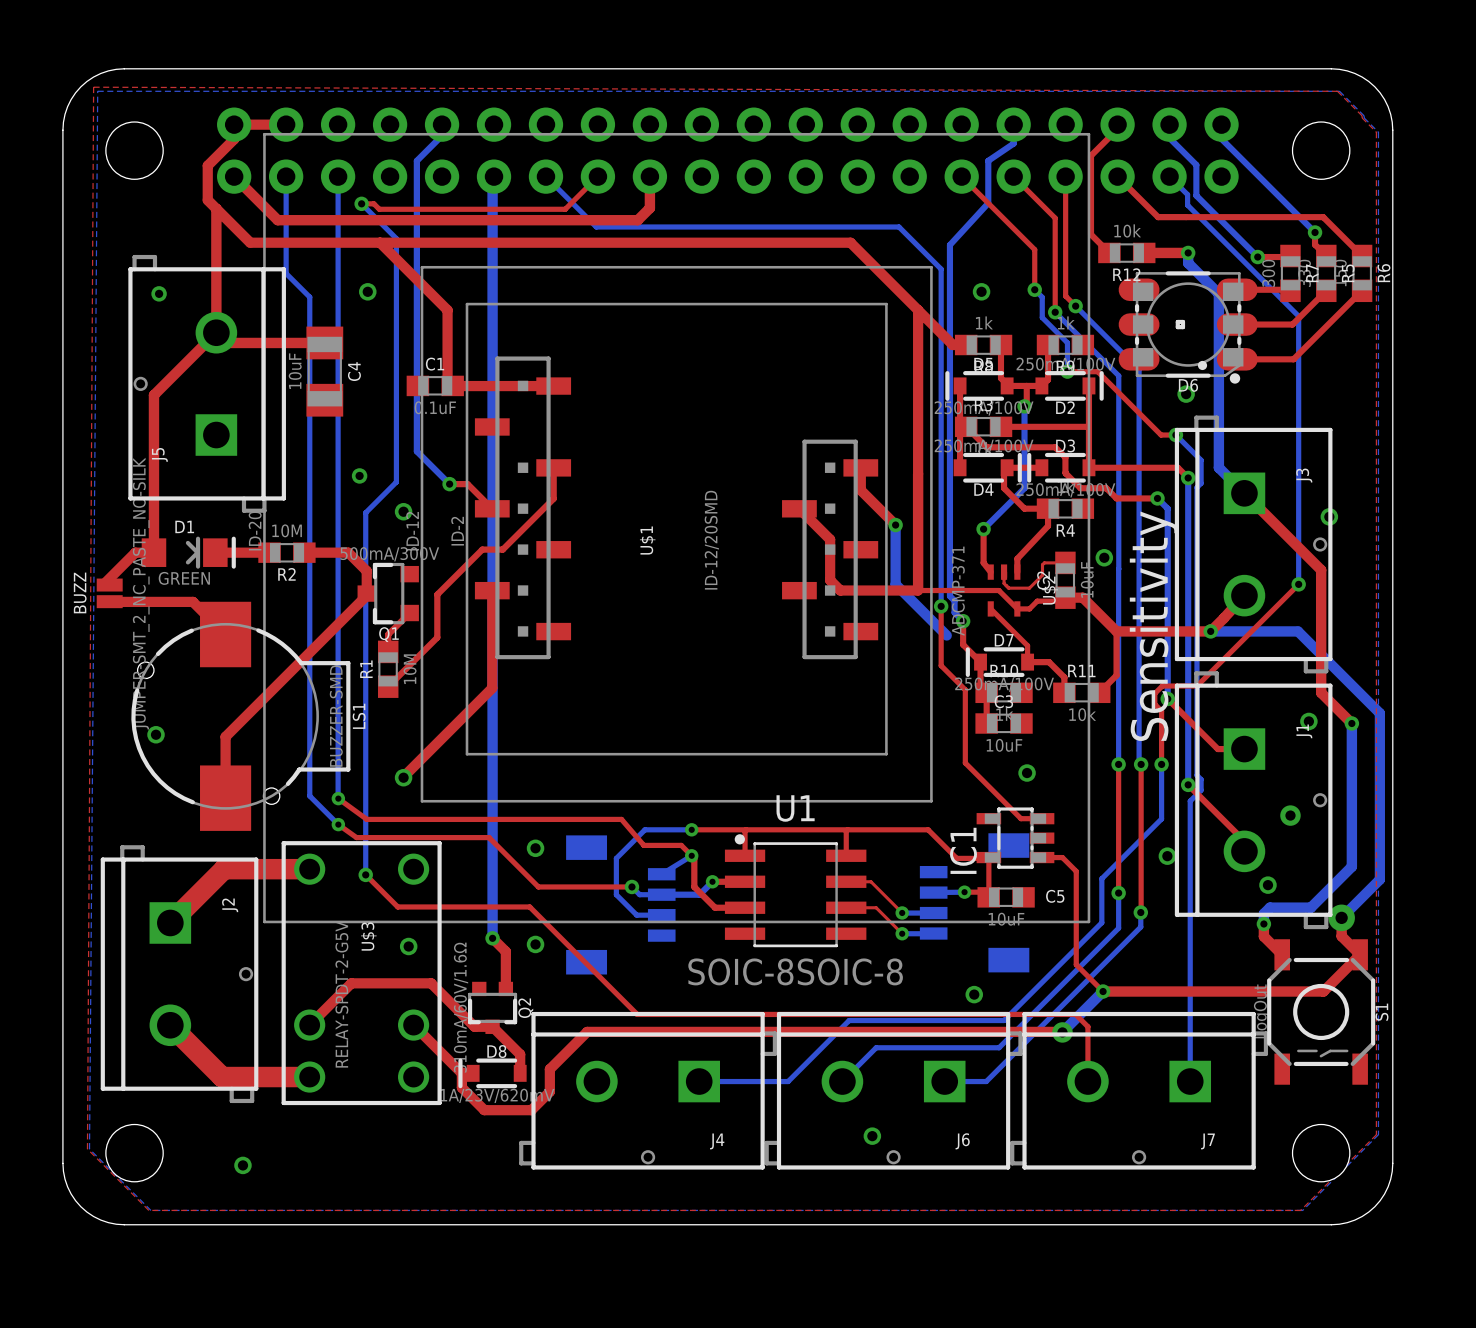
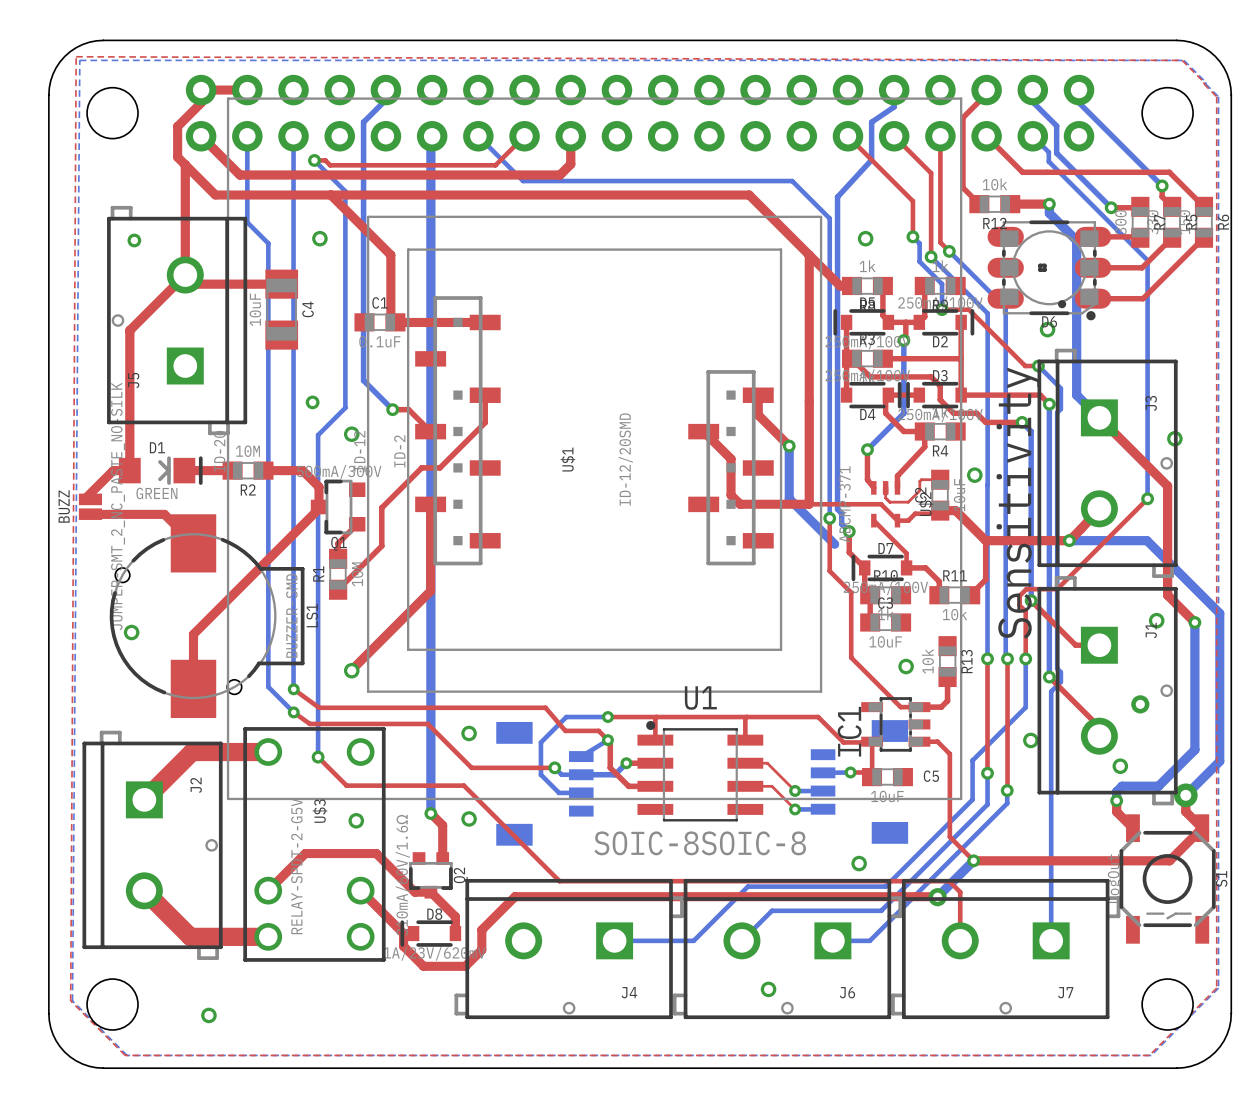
R13: none -> 10k (947, 661)
top track: none -> (947, 677) (947, 700) (941, 707) (919, 707)

